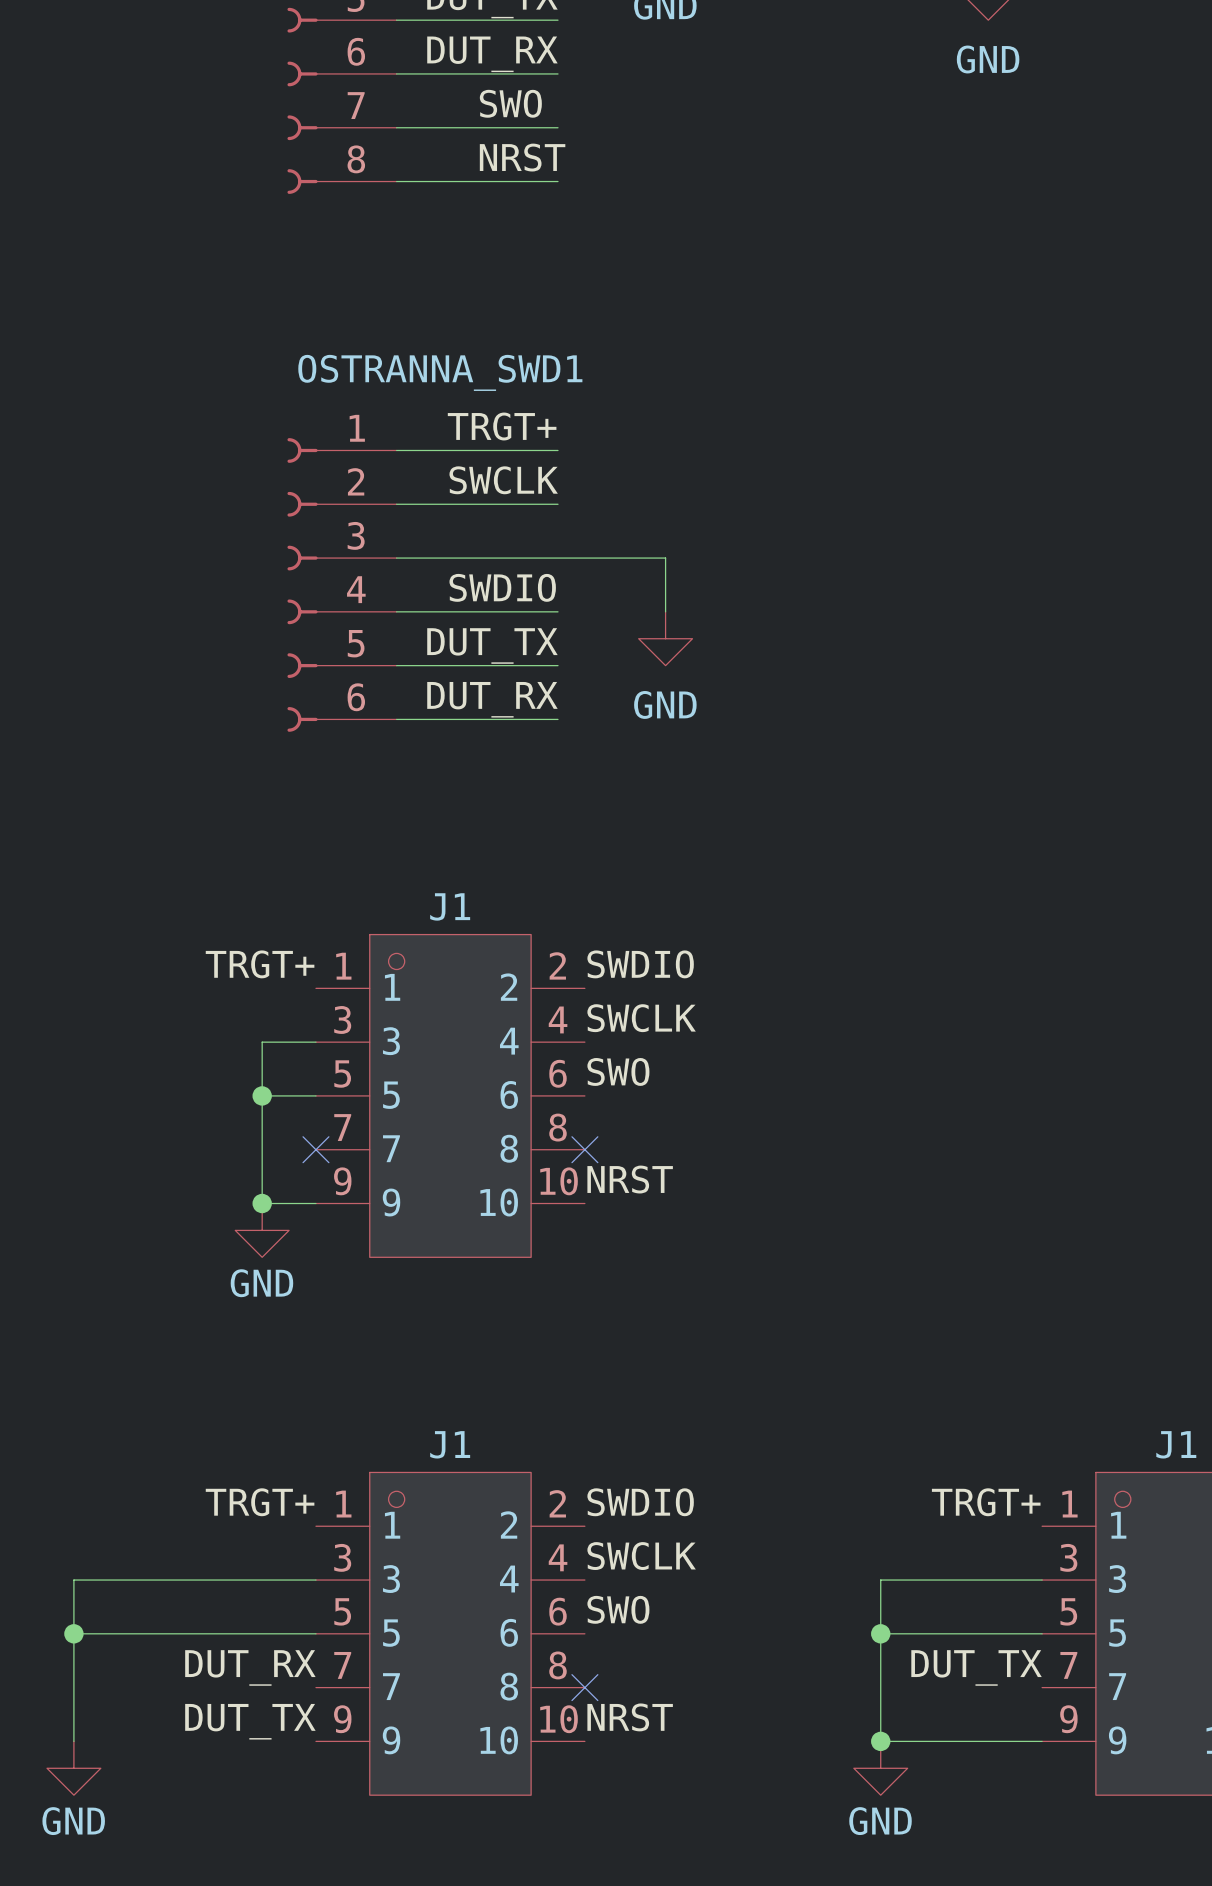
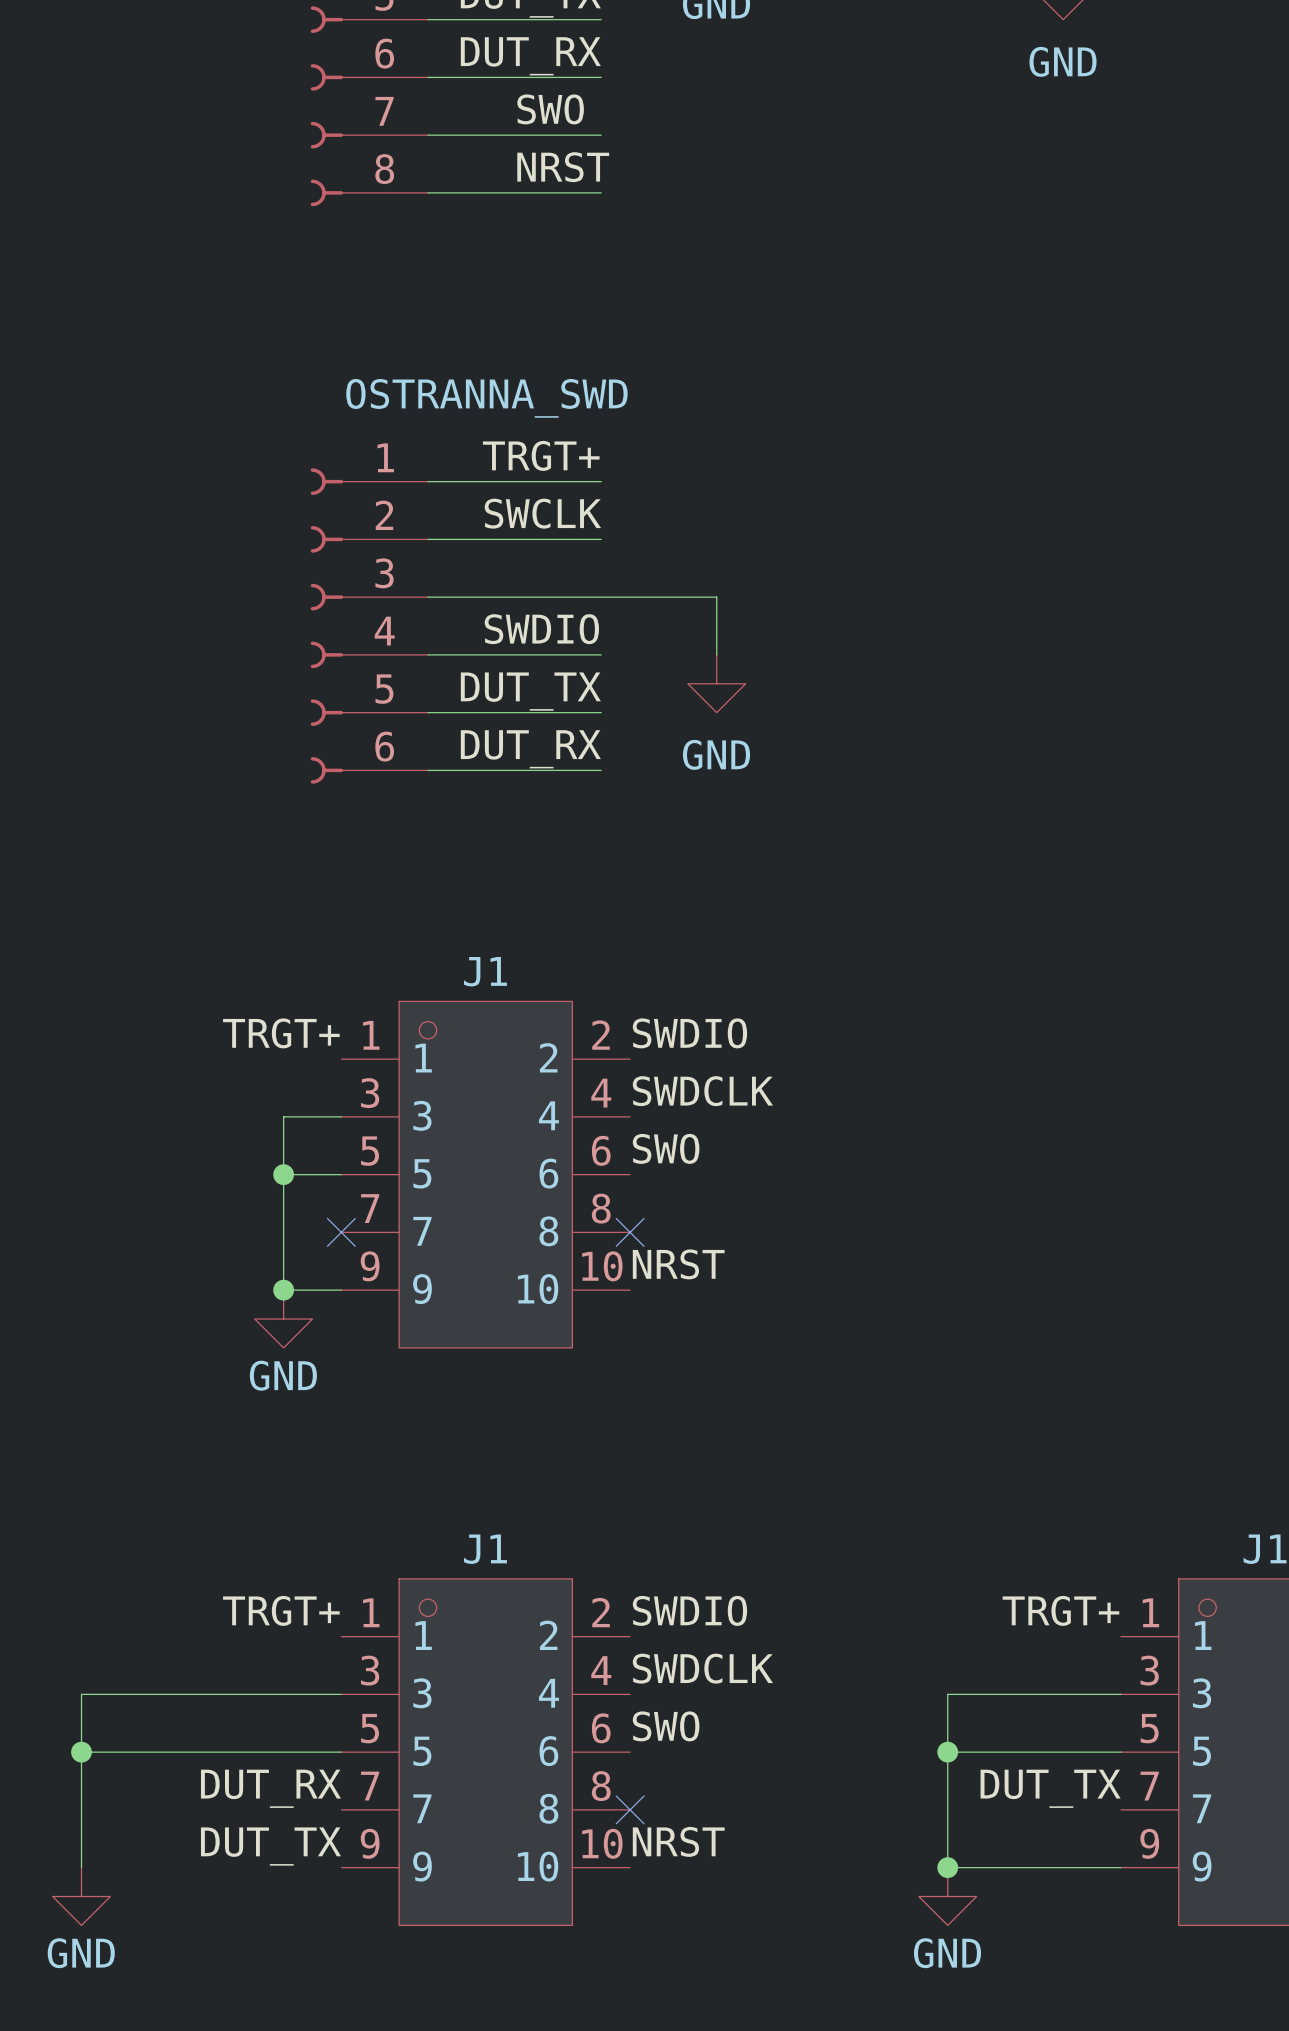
OSTRANNA_SWD1 name: OSTRANNA_SWD1 (440, 372) -> OSTRANNA_SWD (486, 398)
label: SWCLK (641, 1018) -> SWDCLK (702, 1091)
label: SWCLK (641, 1556) -> SWDCLK (702, 1668)

